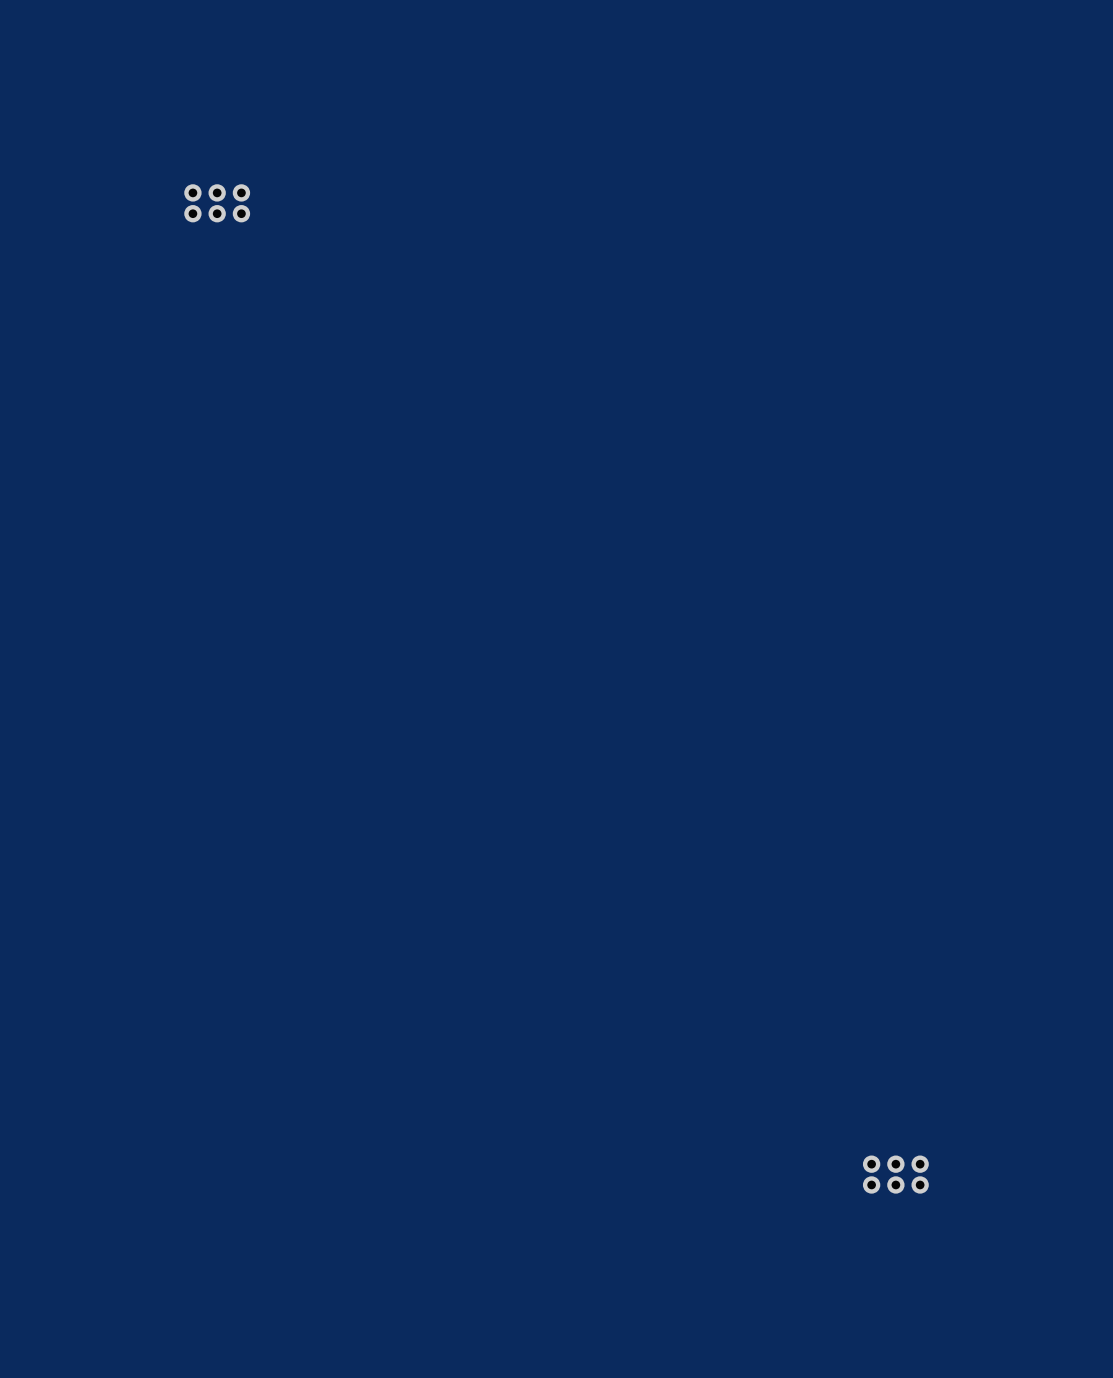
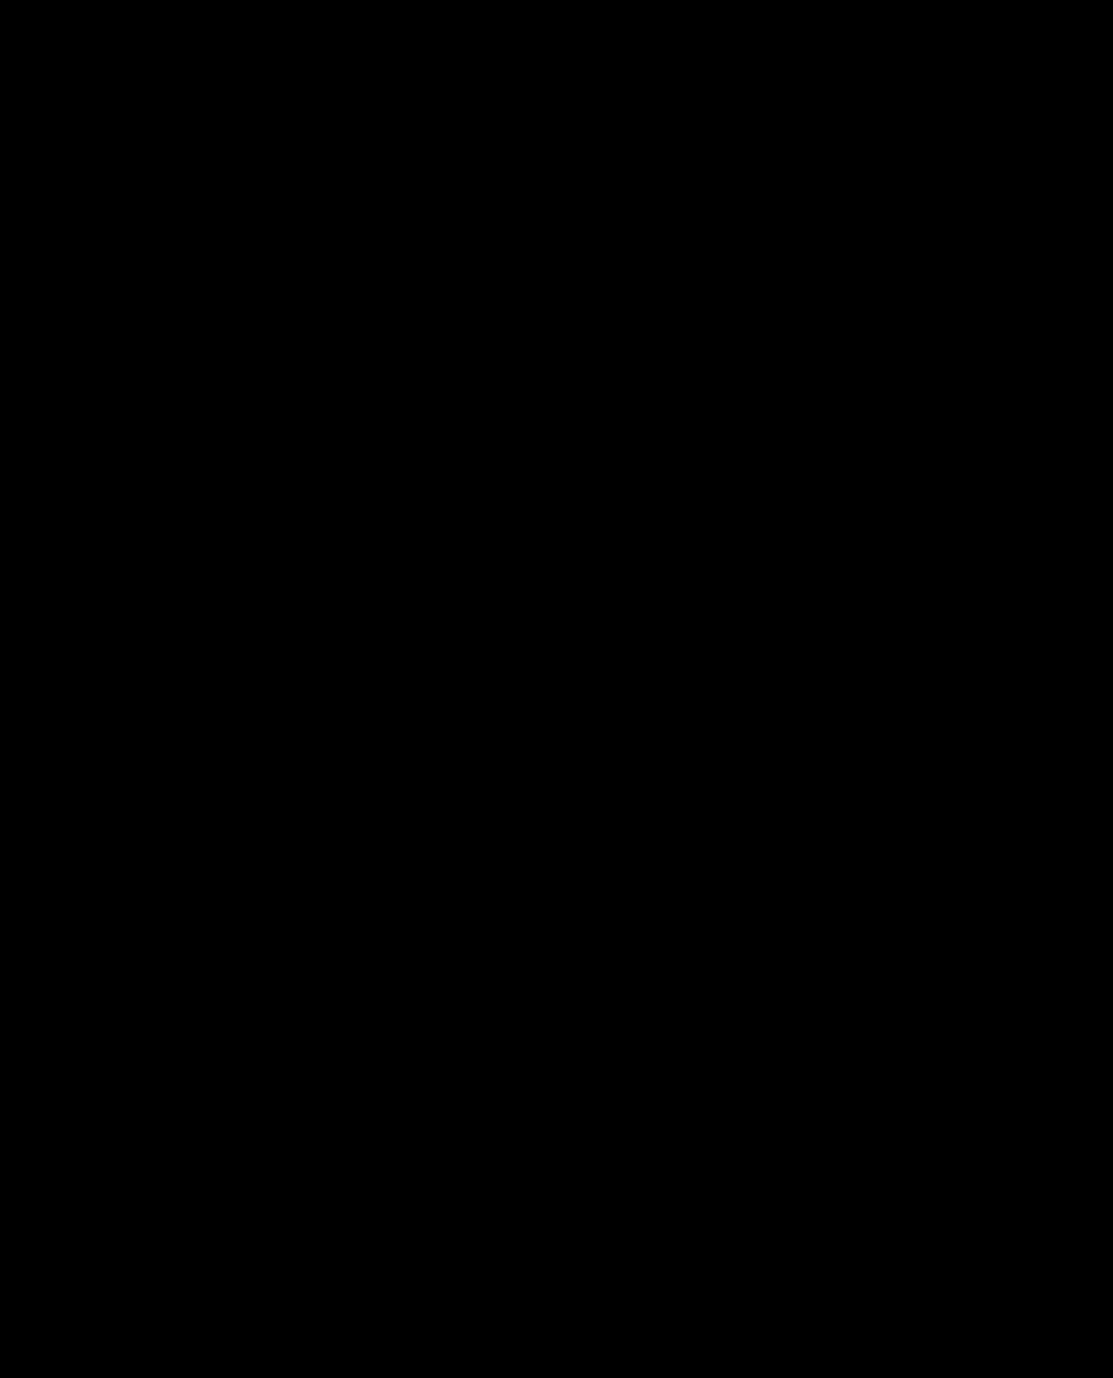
part: (217, 203) -> none
part: (895, 1174) -> none

